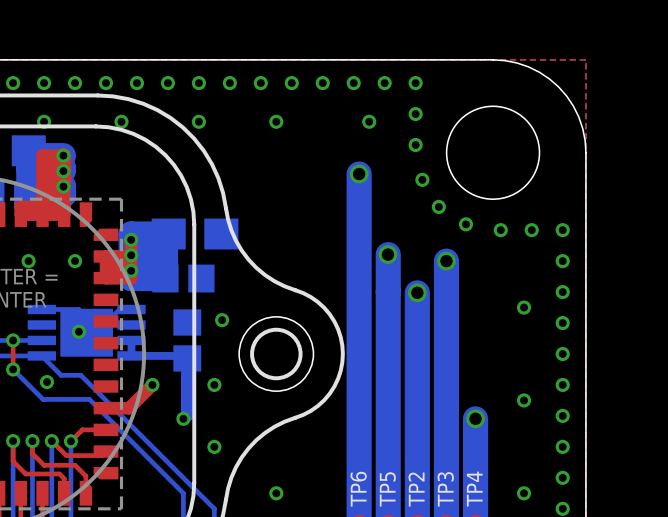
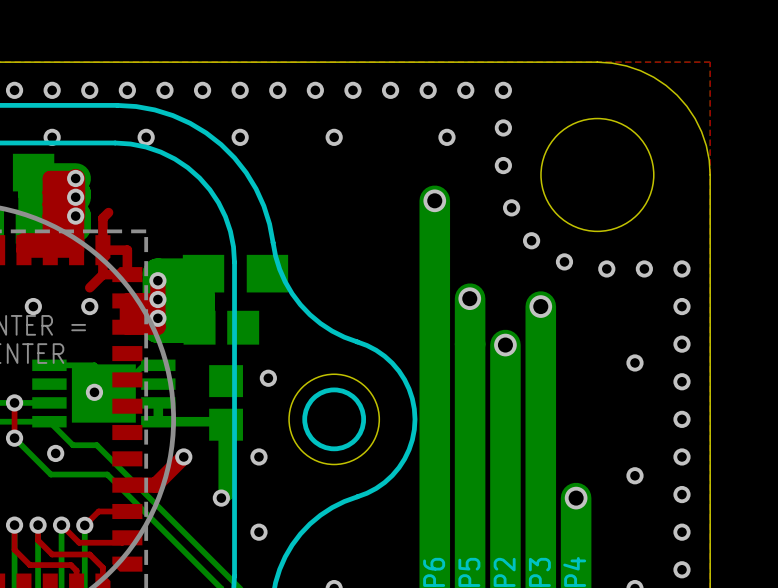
top track: none -> (108, 212) (102, 218) (102, 274)
top track: none -> (102, 250) (127, 250) (127, 274) (102, 274)
top track: none -> (102, 274) (89, 287)

